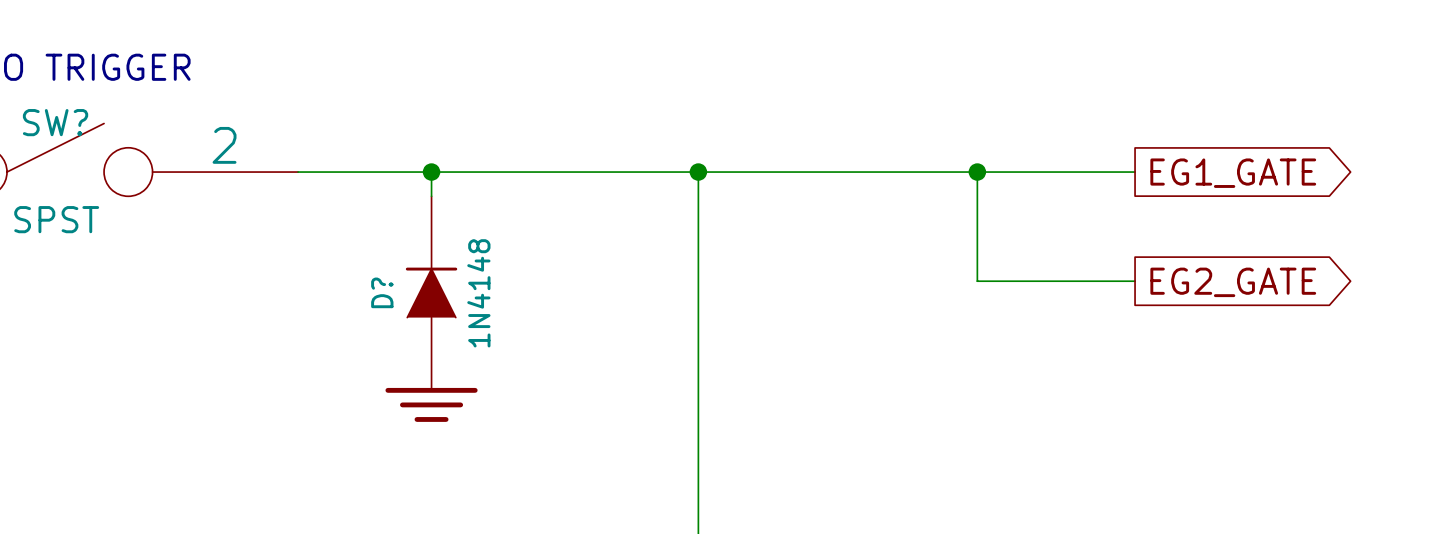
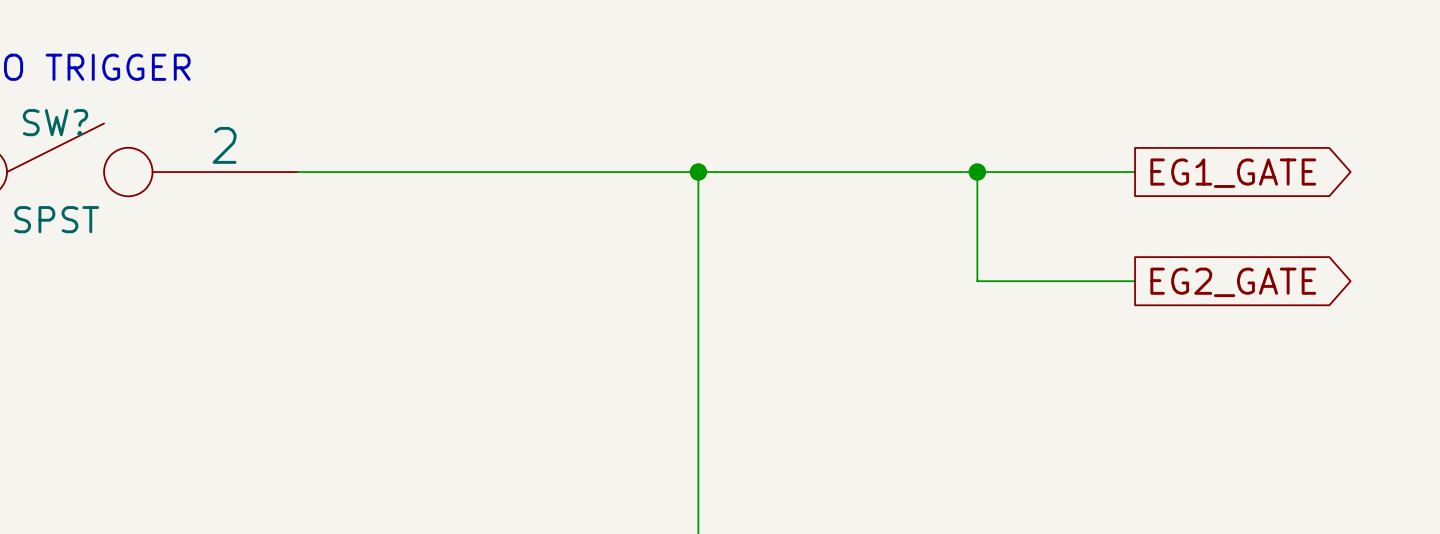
wire: (431, 172) (431, 196) -> none
junction: (431, 172) -> none
D?: 1N4148 (431, 293) -> none
power symbol: (431, 404) -> none

